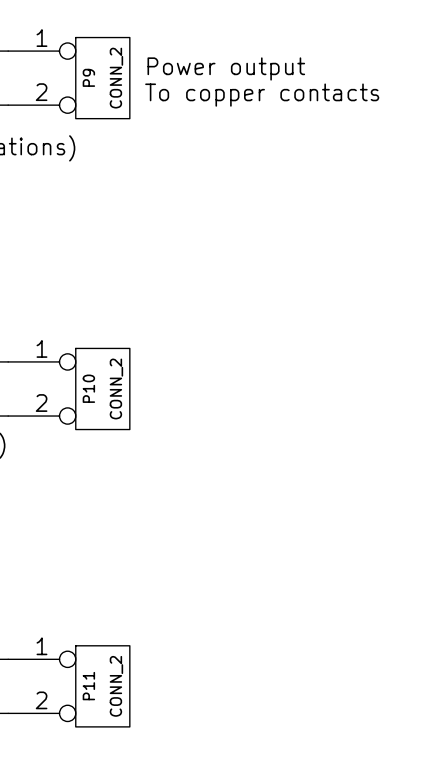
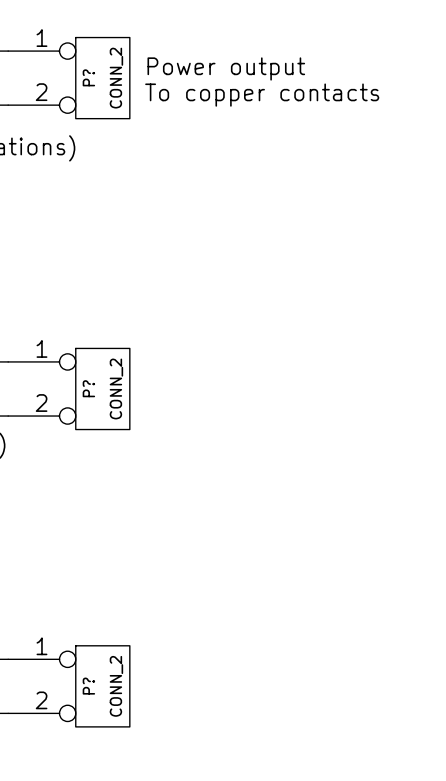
P9 name: P9 (88, 77) -> P? (88, 77)
P10 name: P10 (88, 388) -> P? (88, 388)
P11 name: P11 (88, 686) -> P? (88, 686)

